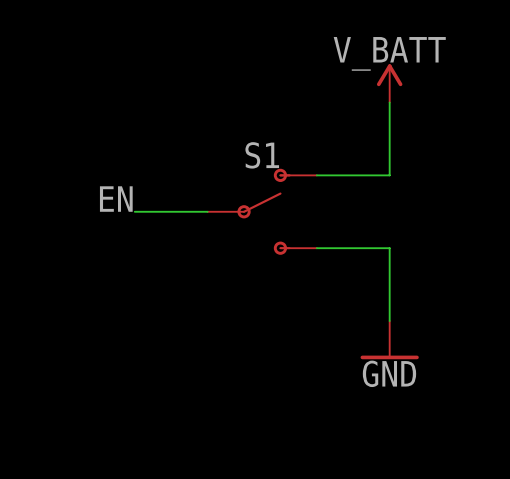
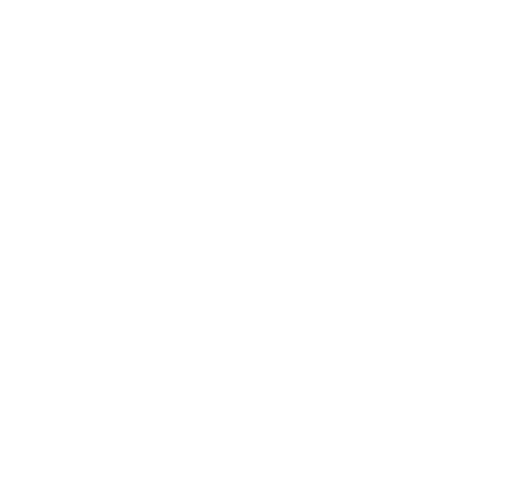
power symbol: V_BATT (389, 83) -> none
wire: (389, 102) (389, 175) (316, 175) -> none
label: EN (116, 199) -> none
wire: (134, 211) (207, 211) -> none
S1: (262, 211) -> none
wire: (316, 248) (389, 248) (389, 321) -> none
power symbol: GND (389, 340) -> none

